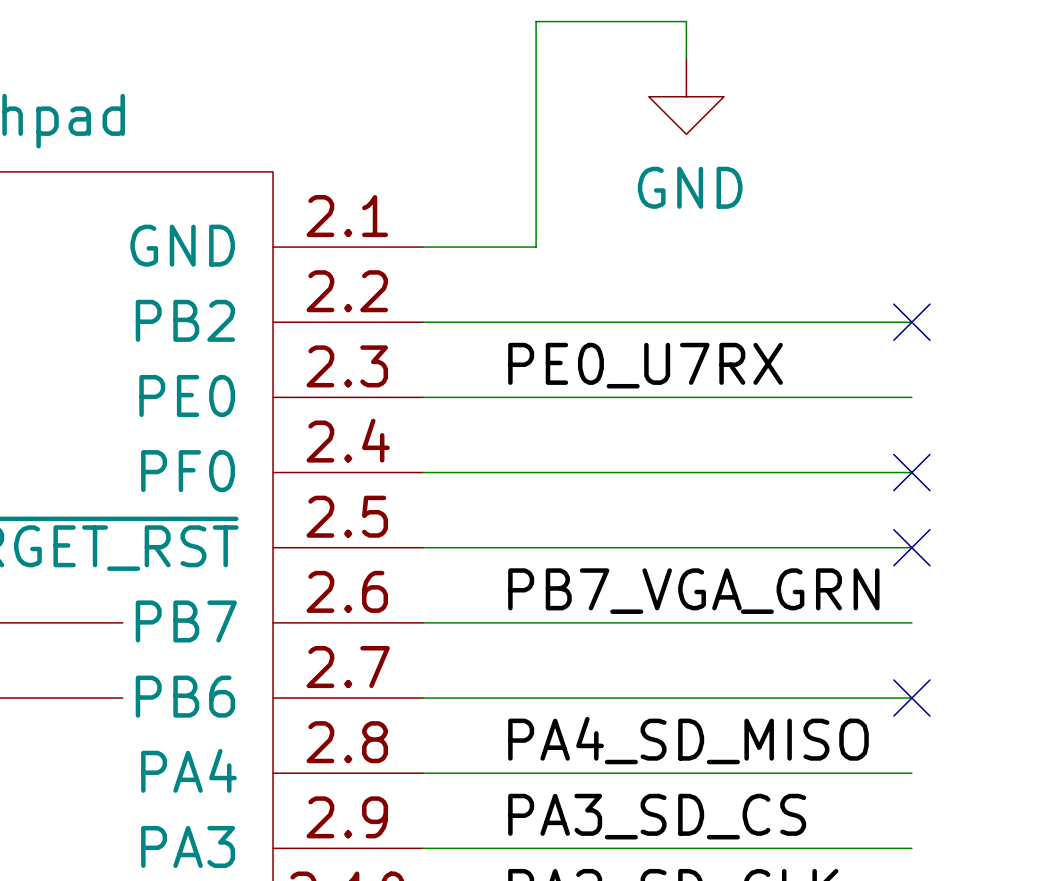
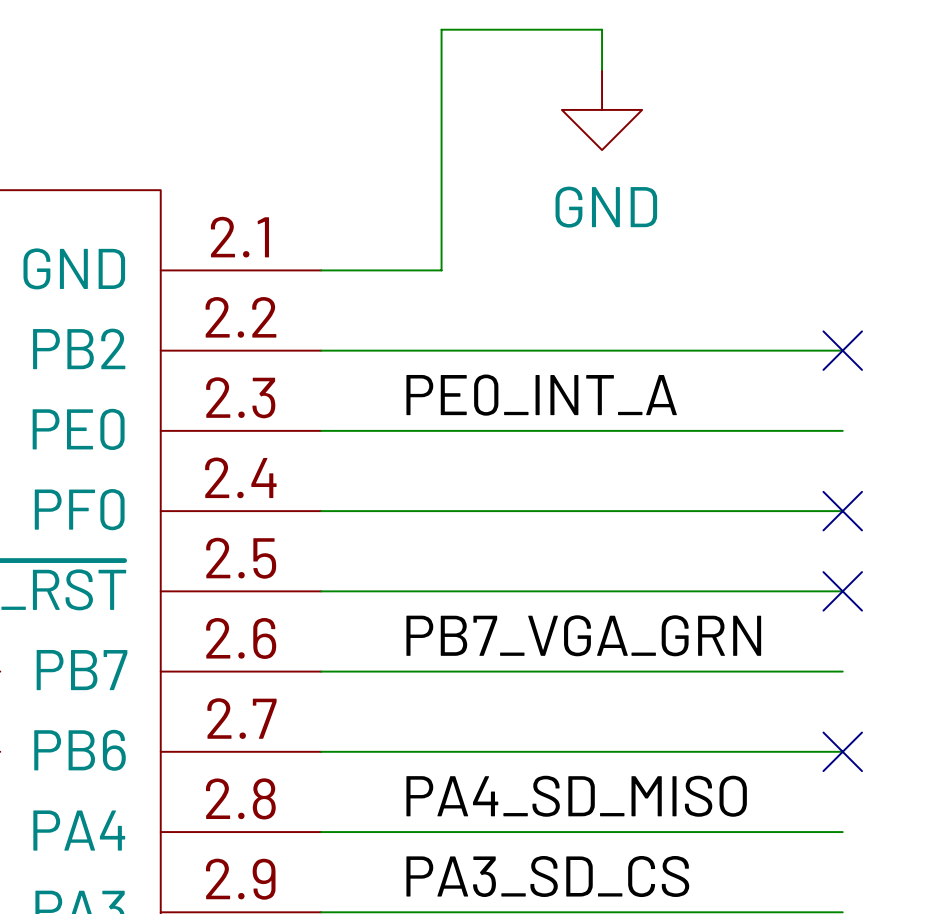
label: PE0_U7RX (645, 365) -> PE0_INT_A (541, 395)

